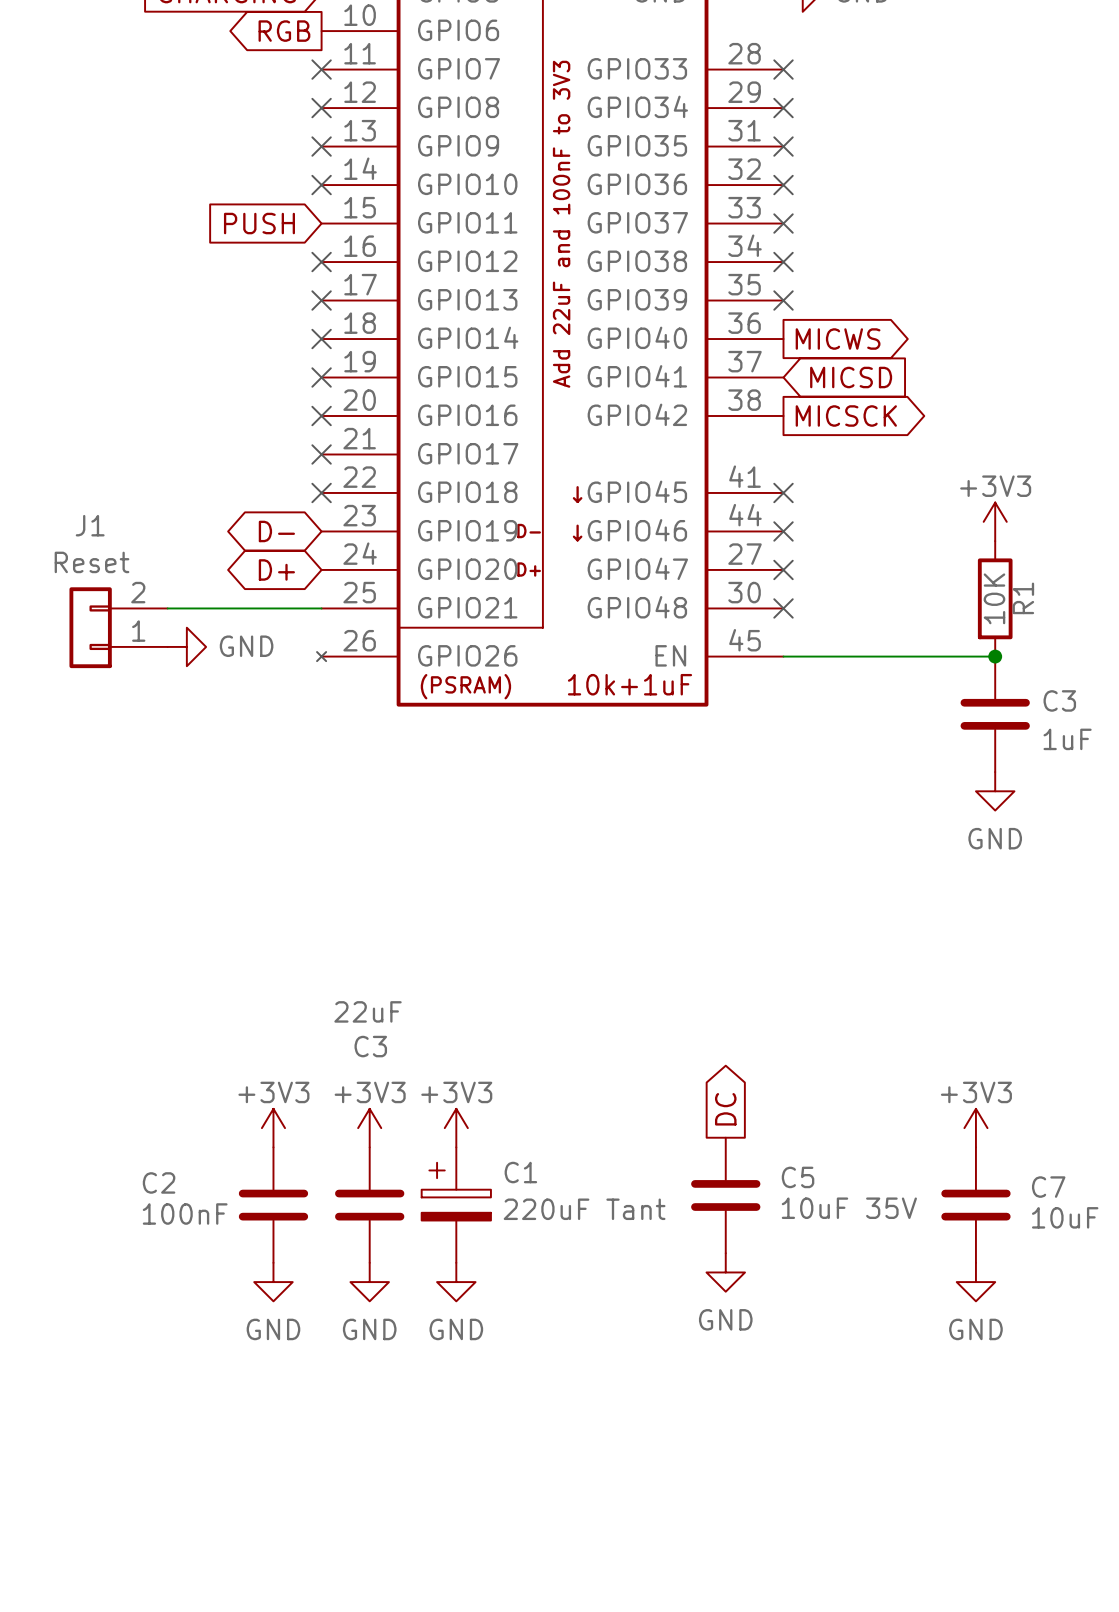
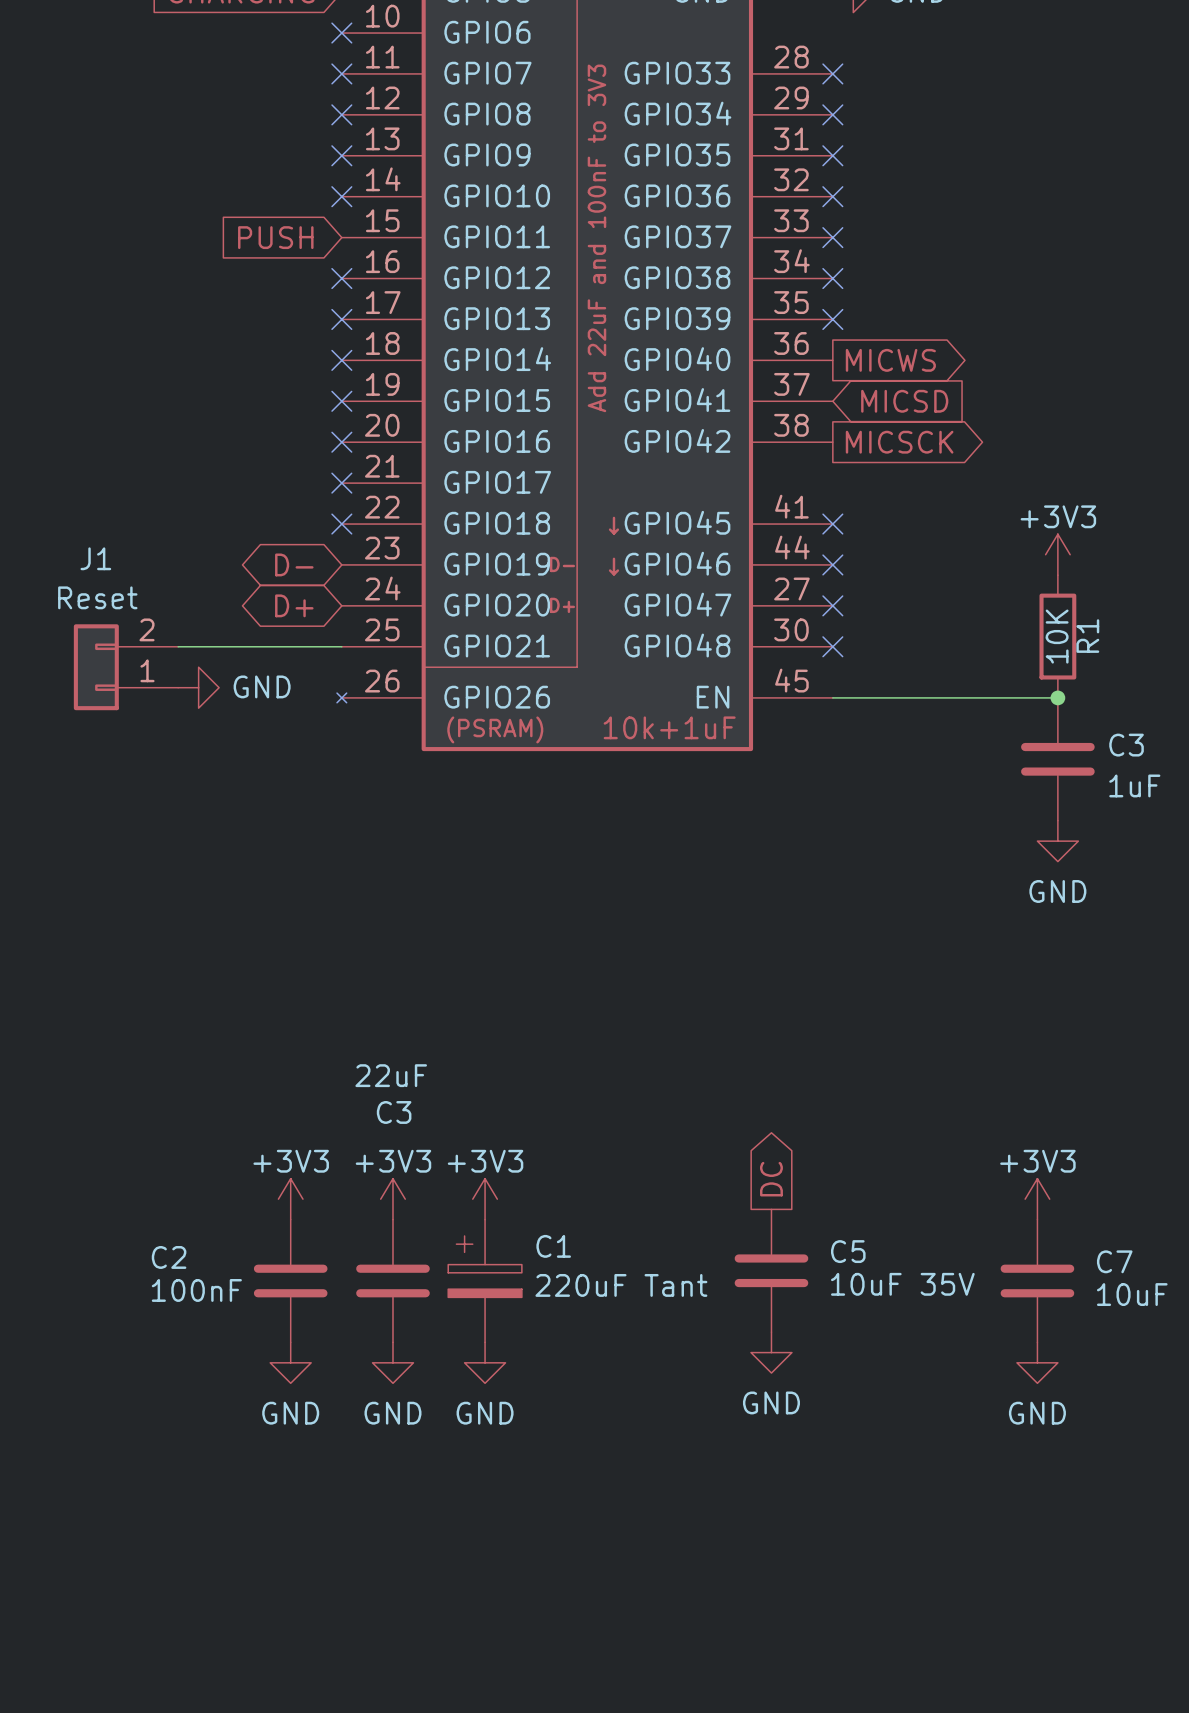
global label: RGB (284, 31) -> none
no-connect mark: none -> (341, 33)

